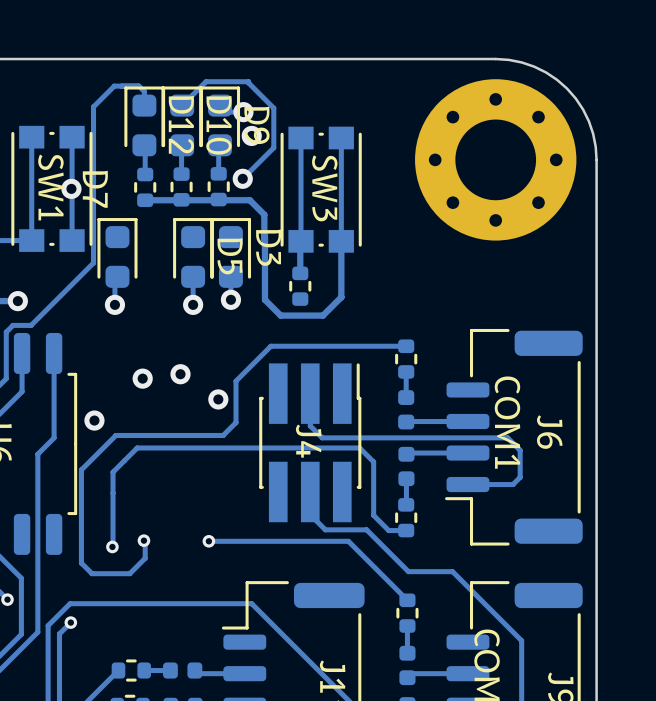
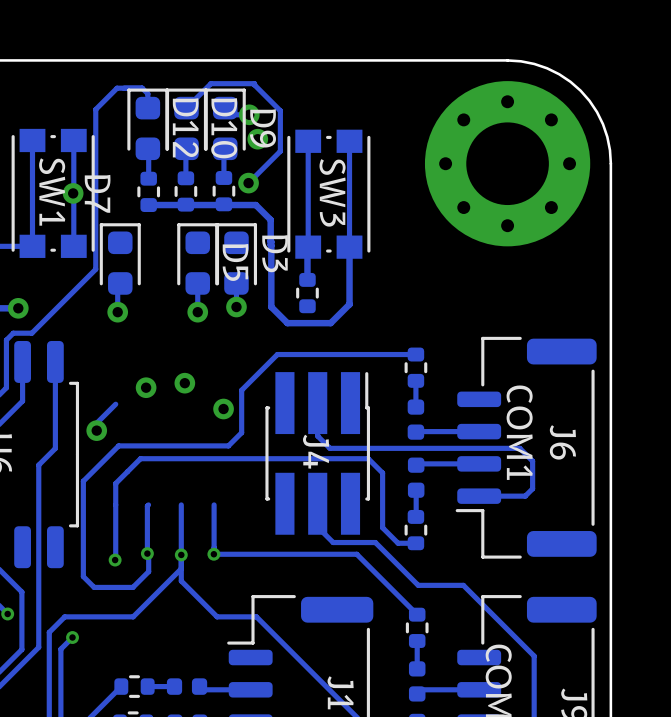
track: none -> (115, 404) (96, 423)
track: none -> (148, 504) (147, 553)
track: none -> (181, 504) (181, 581) (217, 616) (257, 618)
track: none -> (214, 504) (214, 550)
via: none -> (181, 554)
track: (251, 603) (70, 603) (48, 625) -> (181, 568) (133, 616) (64, 616) (49, 632) (49, 640)

